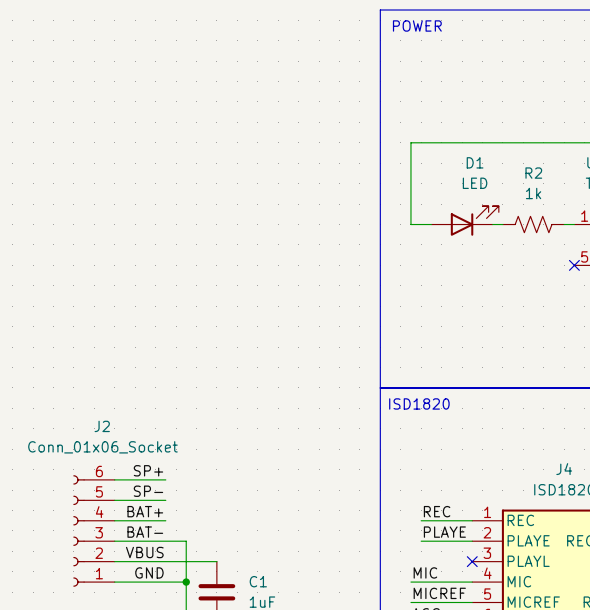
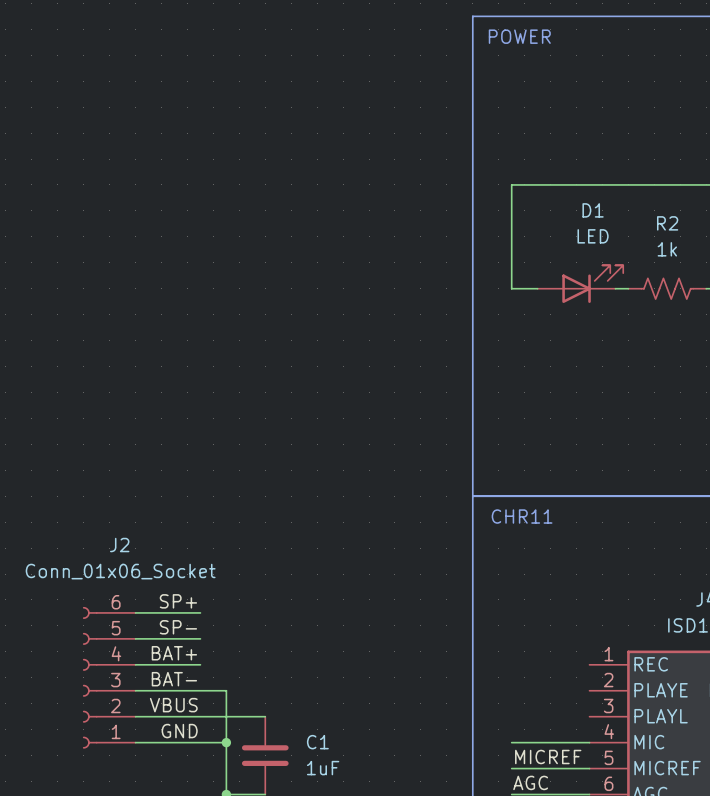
text: ISD1820 (419, 403) -> CHR11 (522, 516)
label: REC (437, 511) -> none
wire: (421, 520) (472, 520) -> none
label: PLAYE (444, 532) -> none
wire: (421, 541) (472, 541) -> none
no-connect mark: (472, 561) -> none
label: MIC (425, 572) -> none

